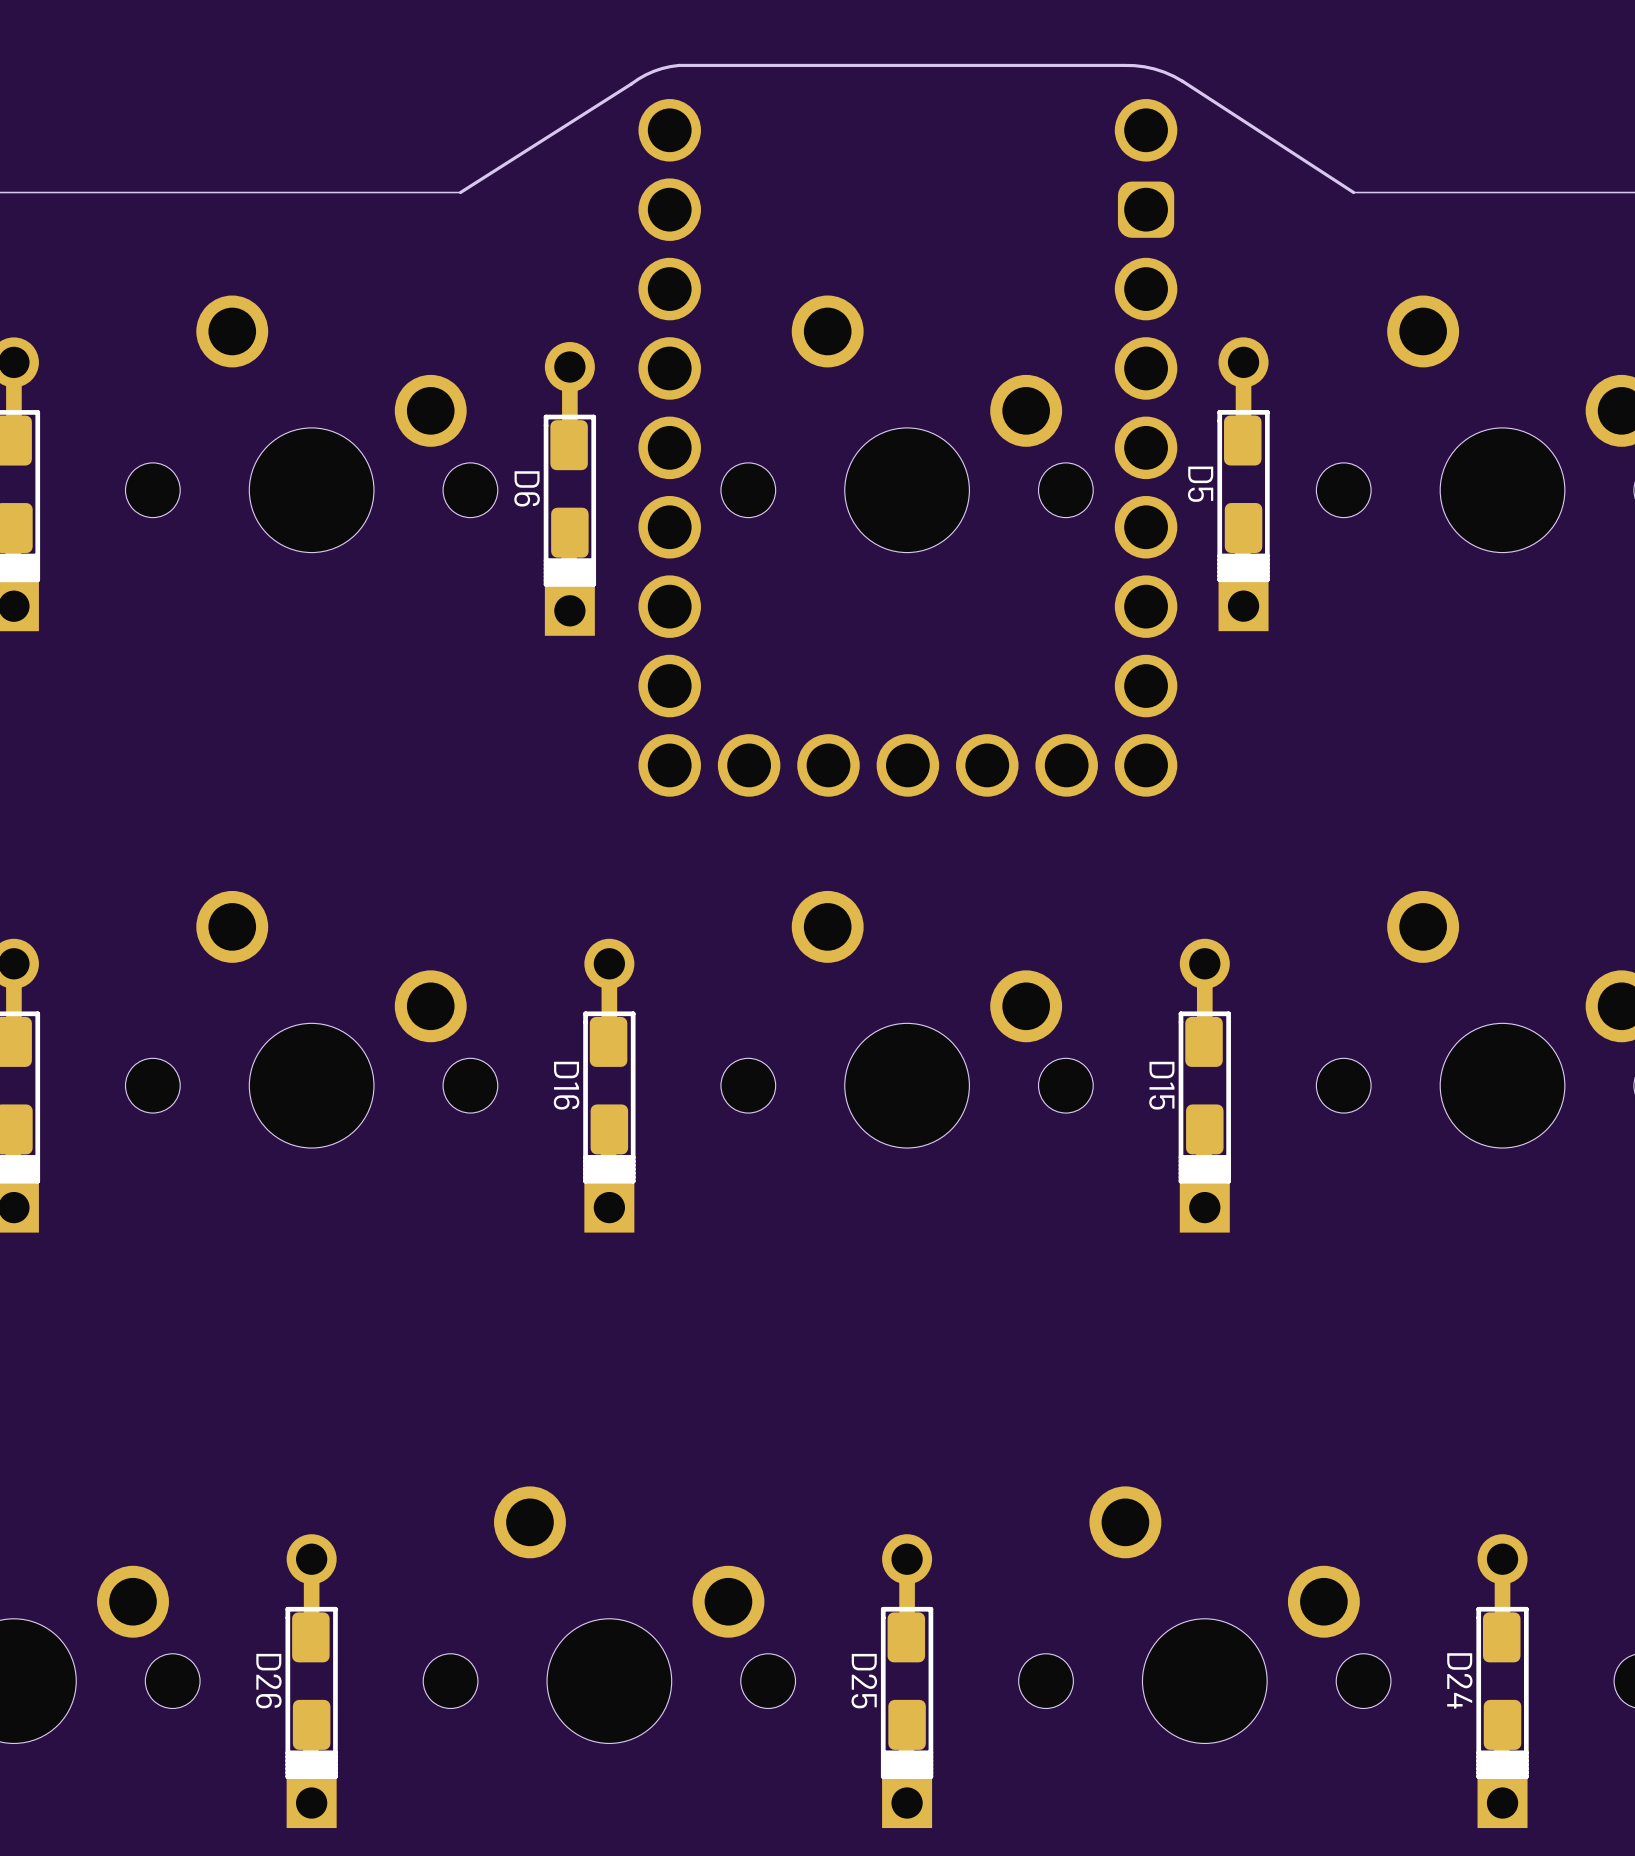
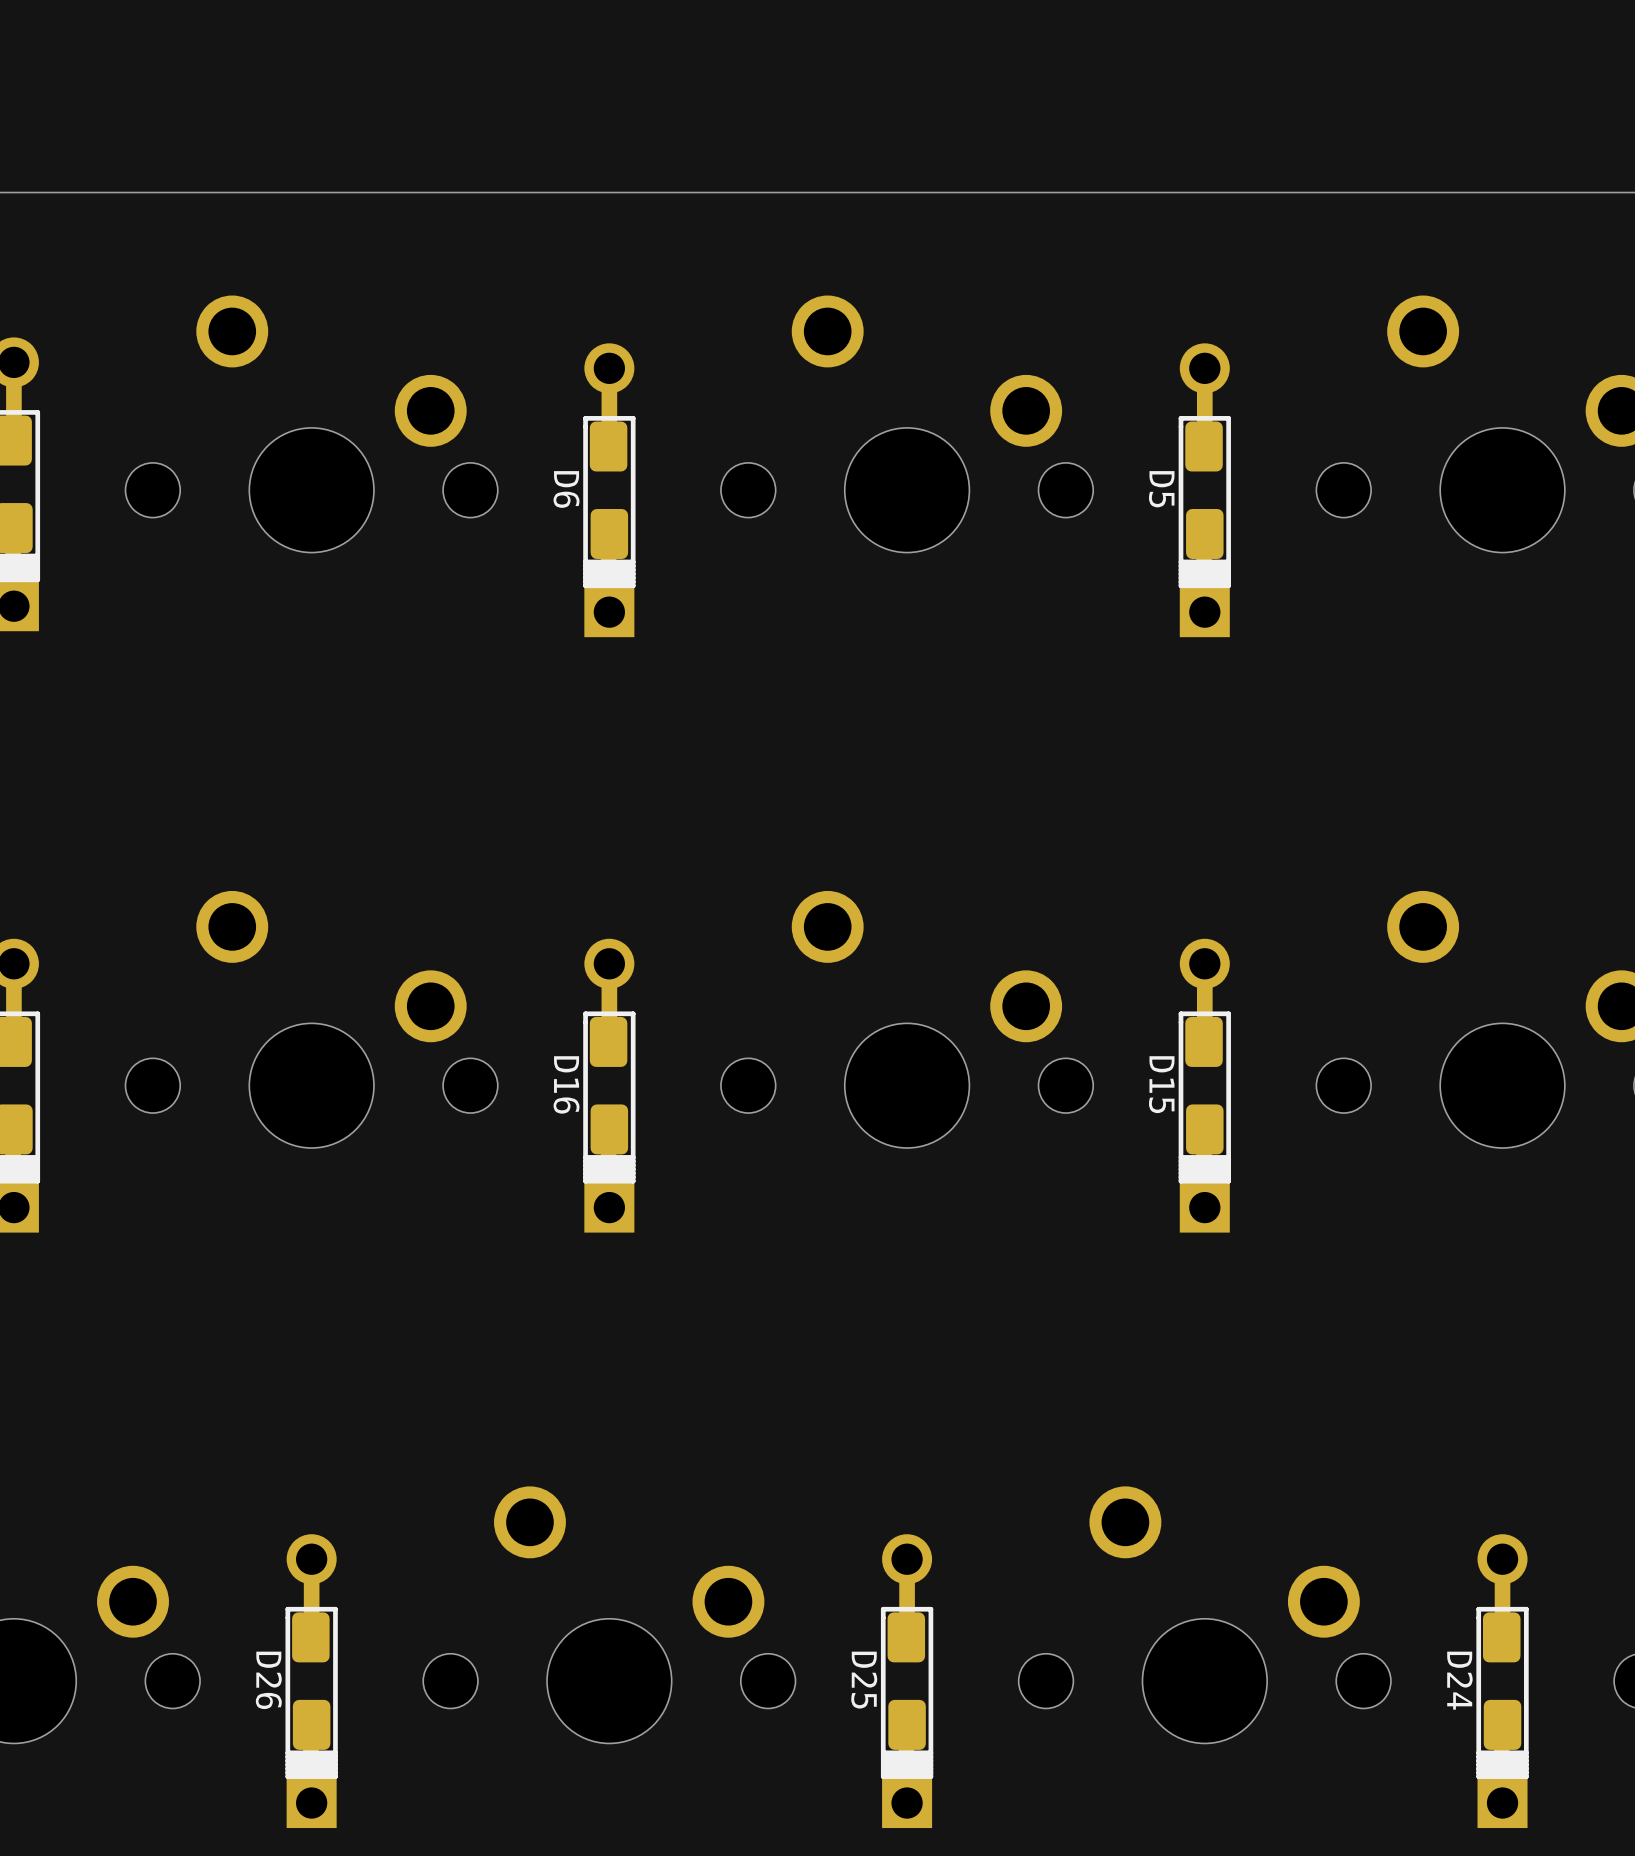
board edge: (1353, 192) (1173, 76) (1154, 69) (1124, 65) (670, 66) (653, 71) (638, 79) (460, 192) -> (1353, 192) (460, 192)
part: (907, 447) -> none
D5 position: (1243, 484) -> (1204, 490)
D6 position: (569, 488) -> (609, 490)

